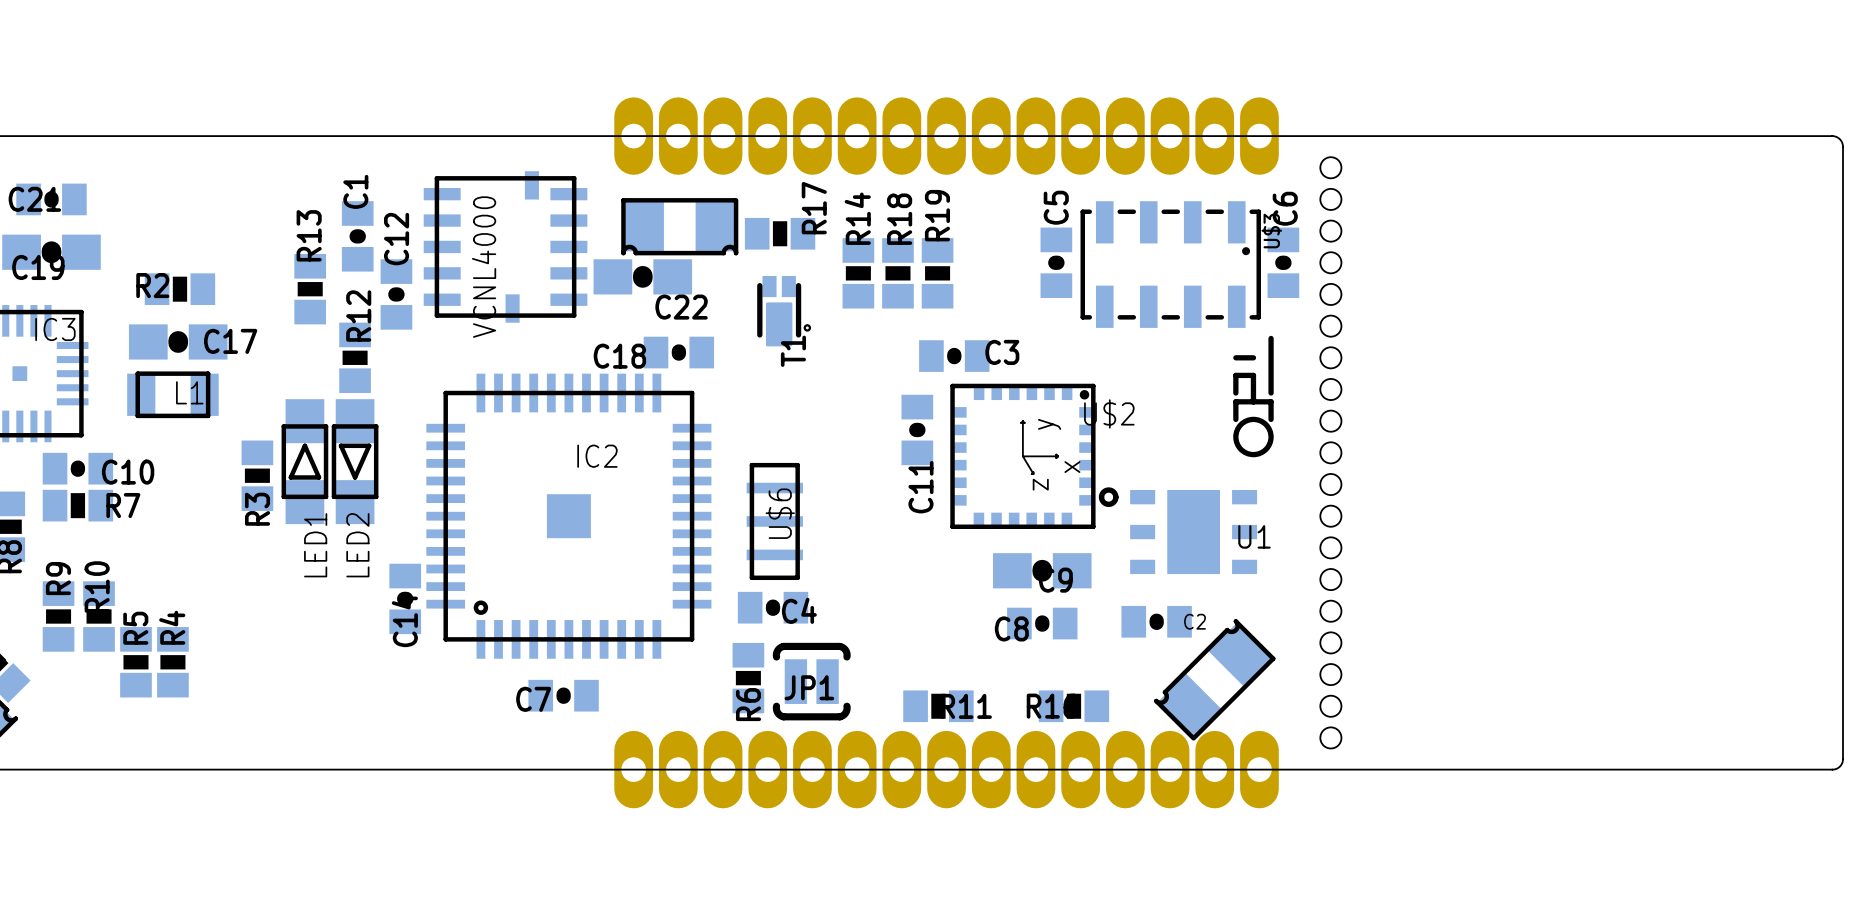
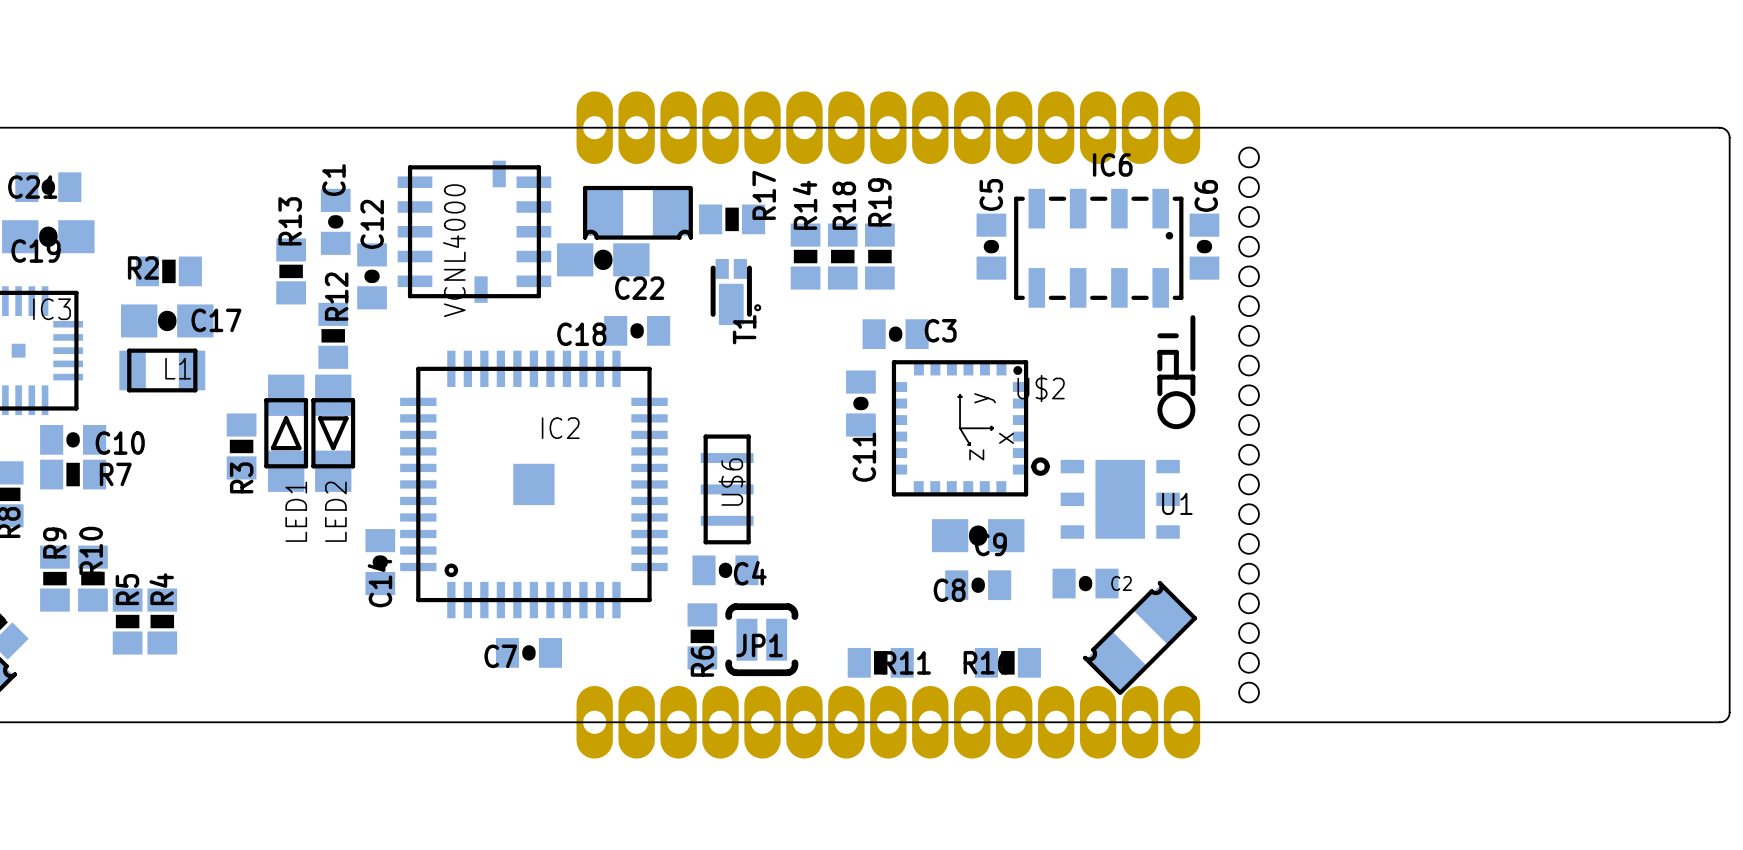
U$3 name: U$3 (1271, 231) -> IC6 (1112, 164)

